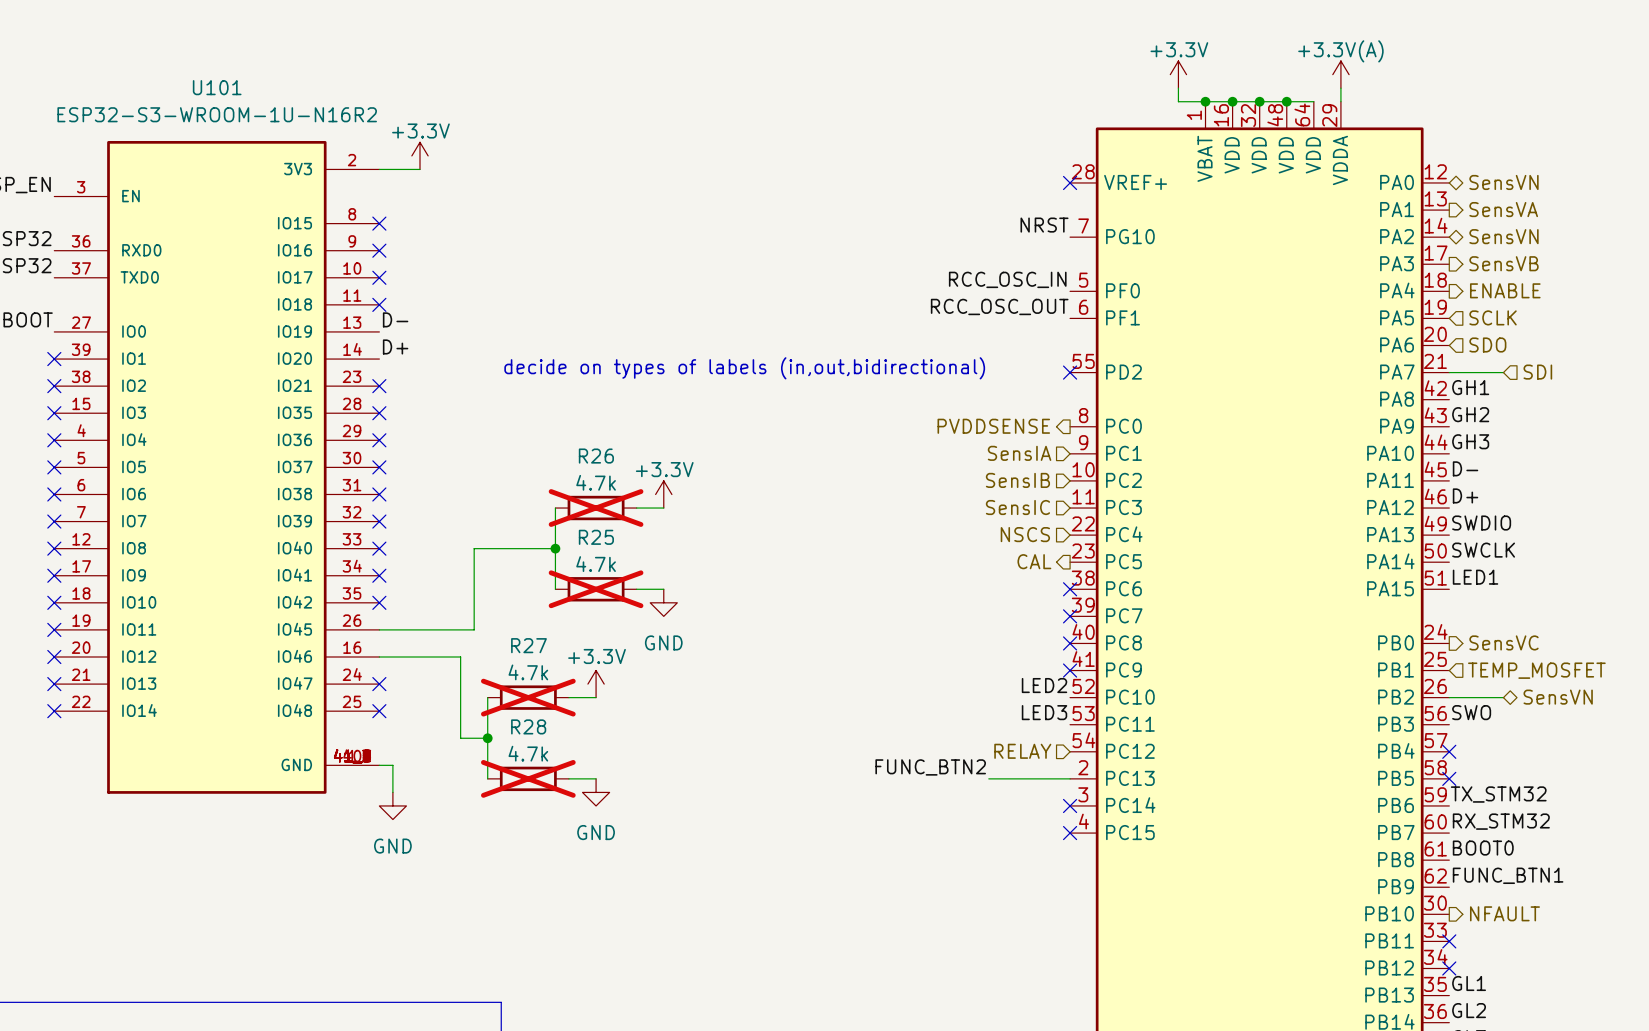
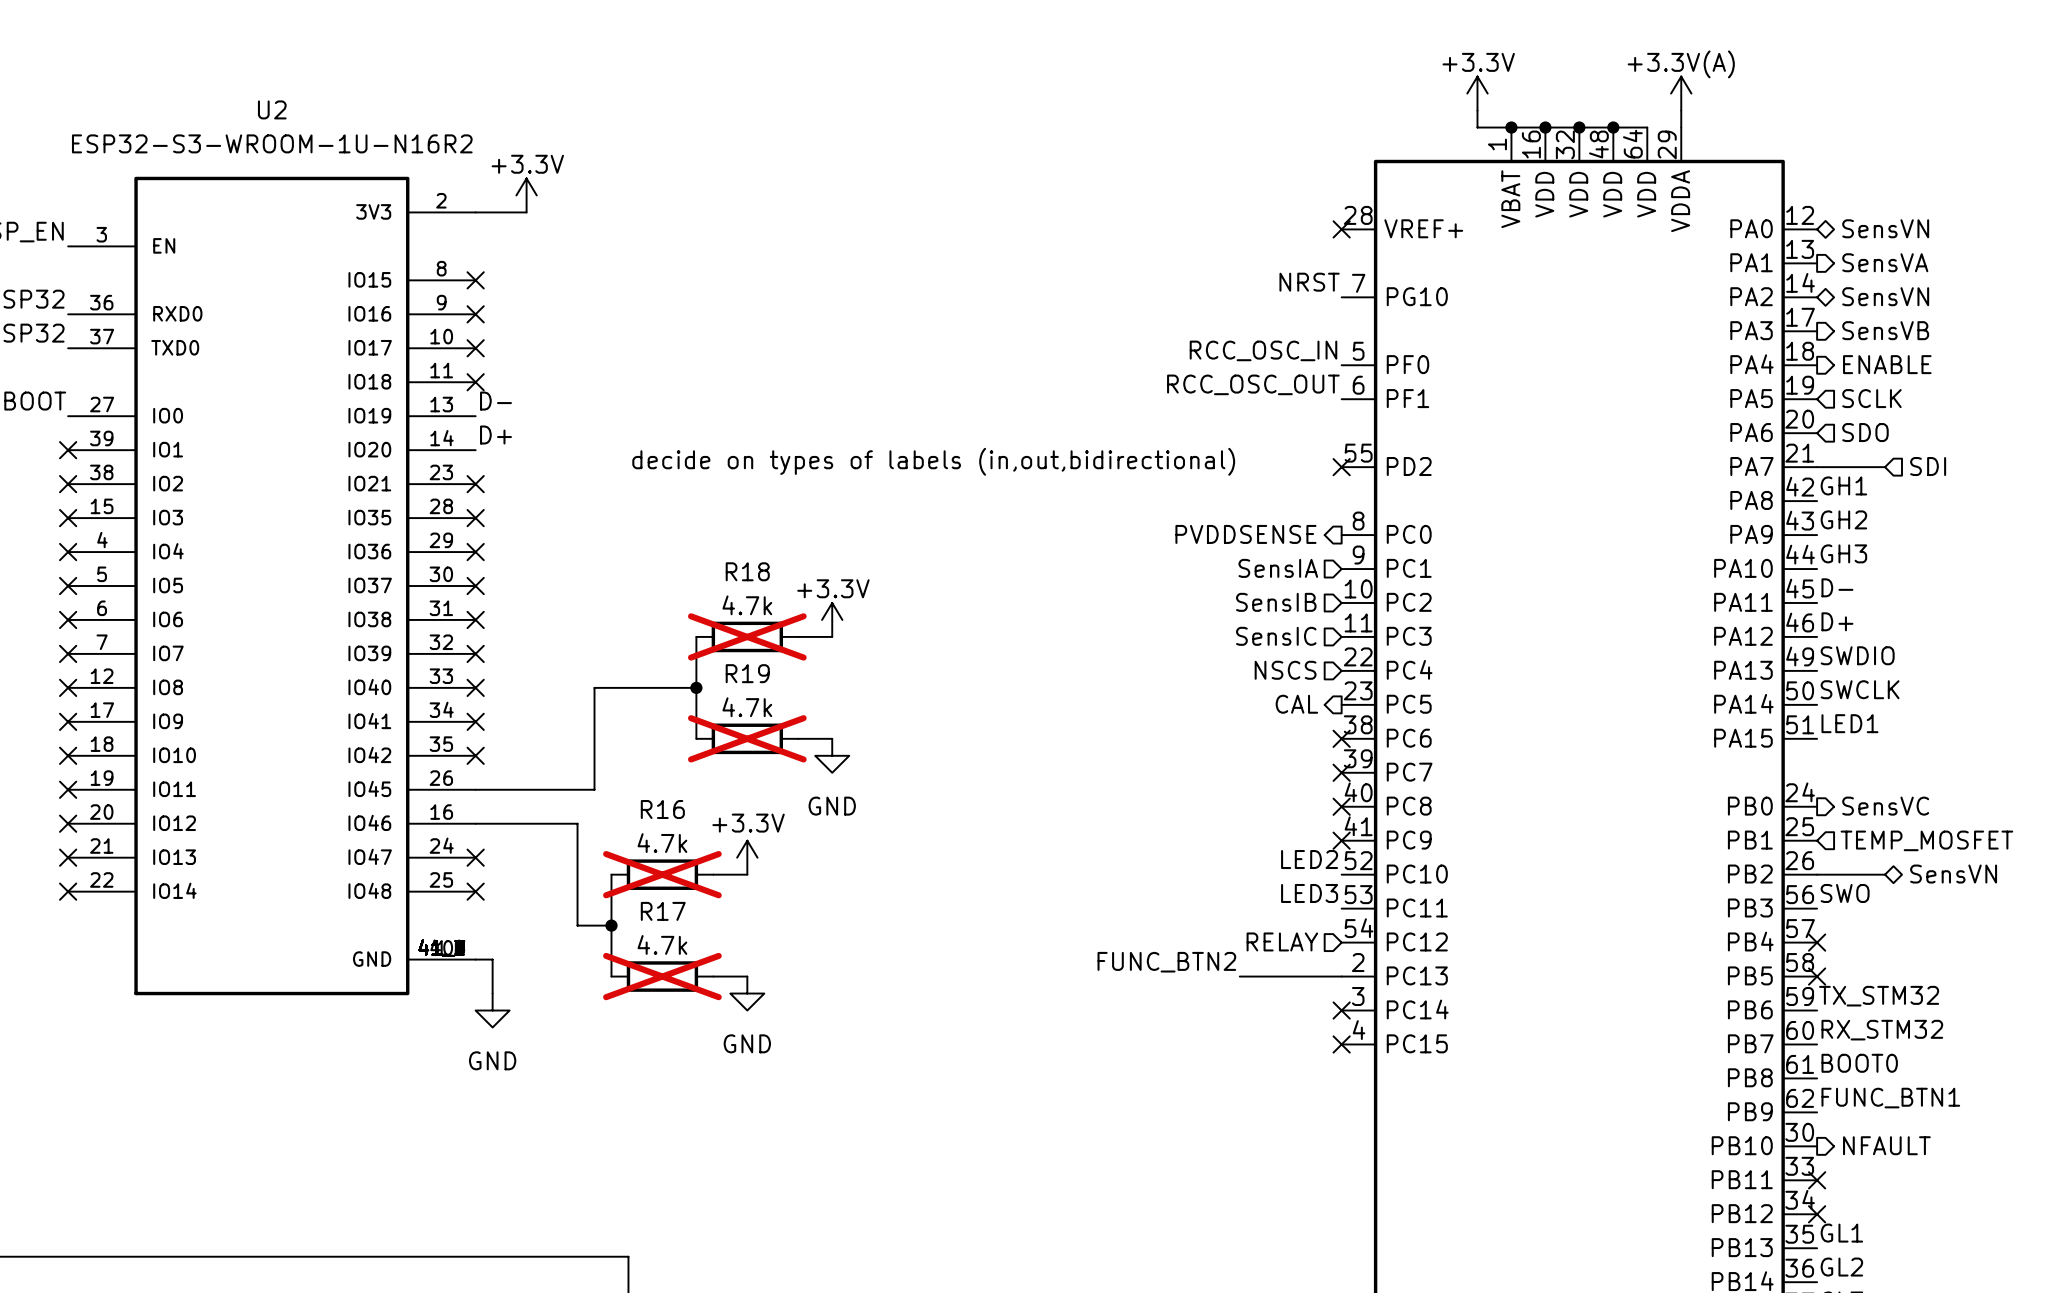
U101 name: U101 (217, 87) -> U2 (272, 109)
R26 name: R26 (596, 456) -> R18 (747, 571)
R25 name: R25 (596, 537) -> R19 (747, 673)
R27 name: R27 (528, 645) -> R16 (662, 809)
R28 name: R28 (528, 726) -> R17 (663, 911)

